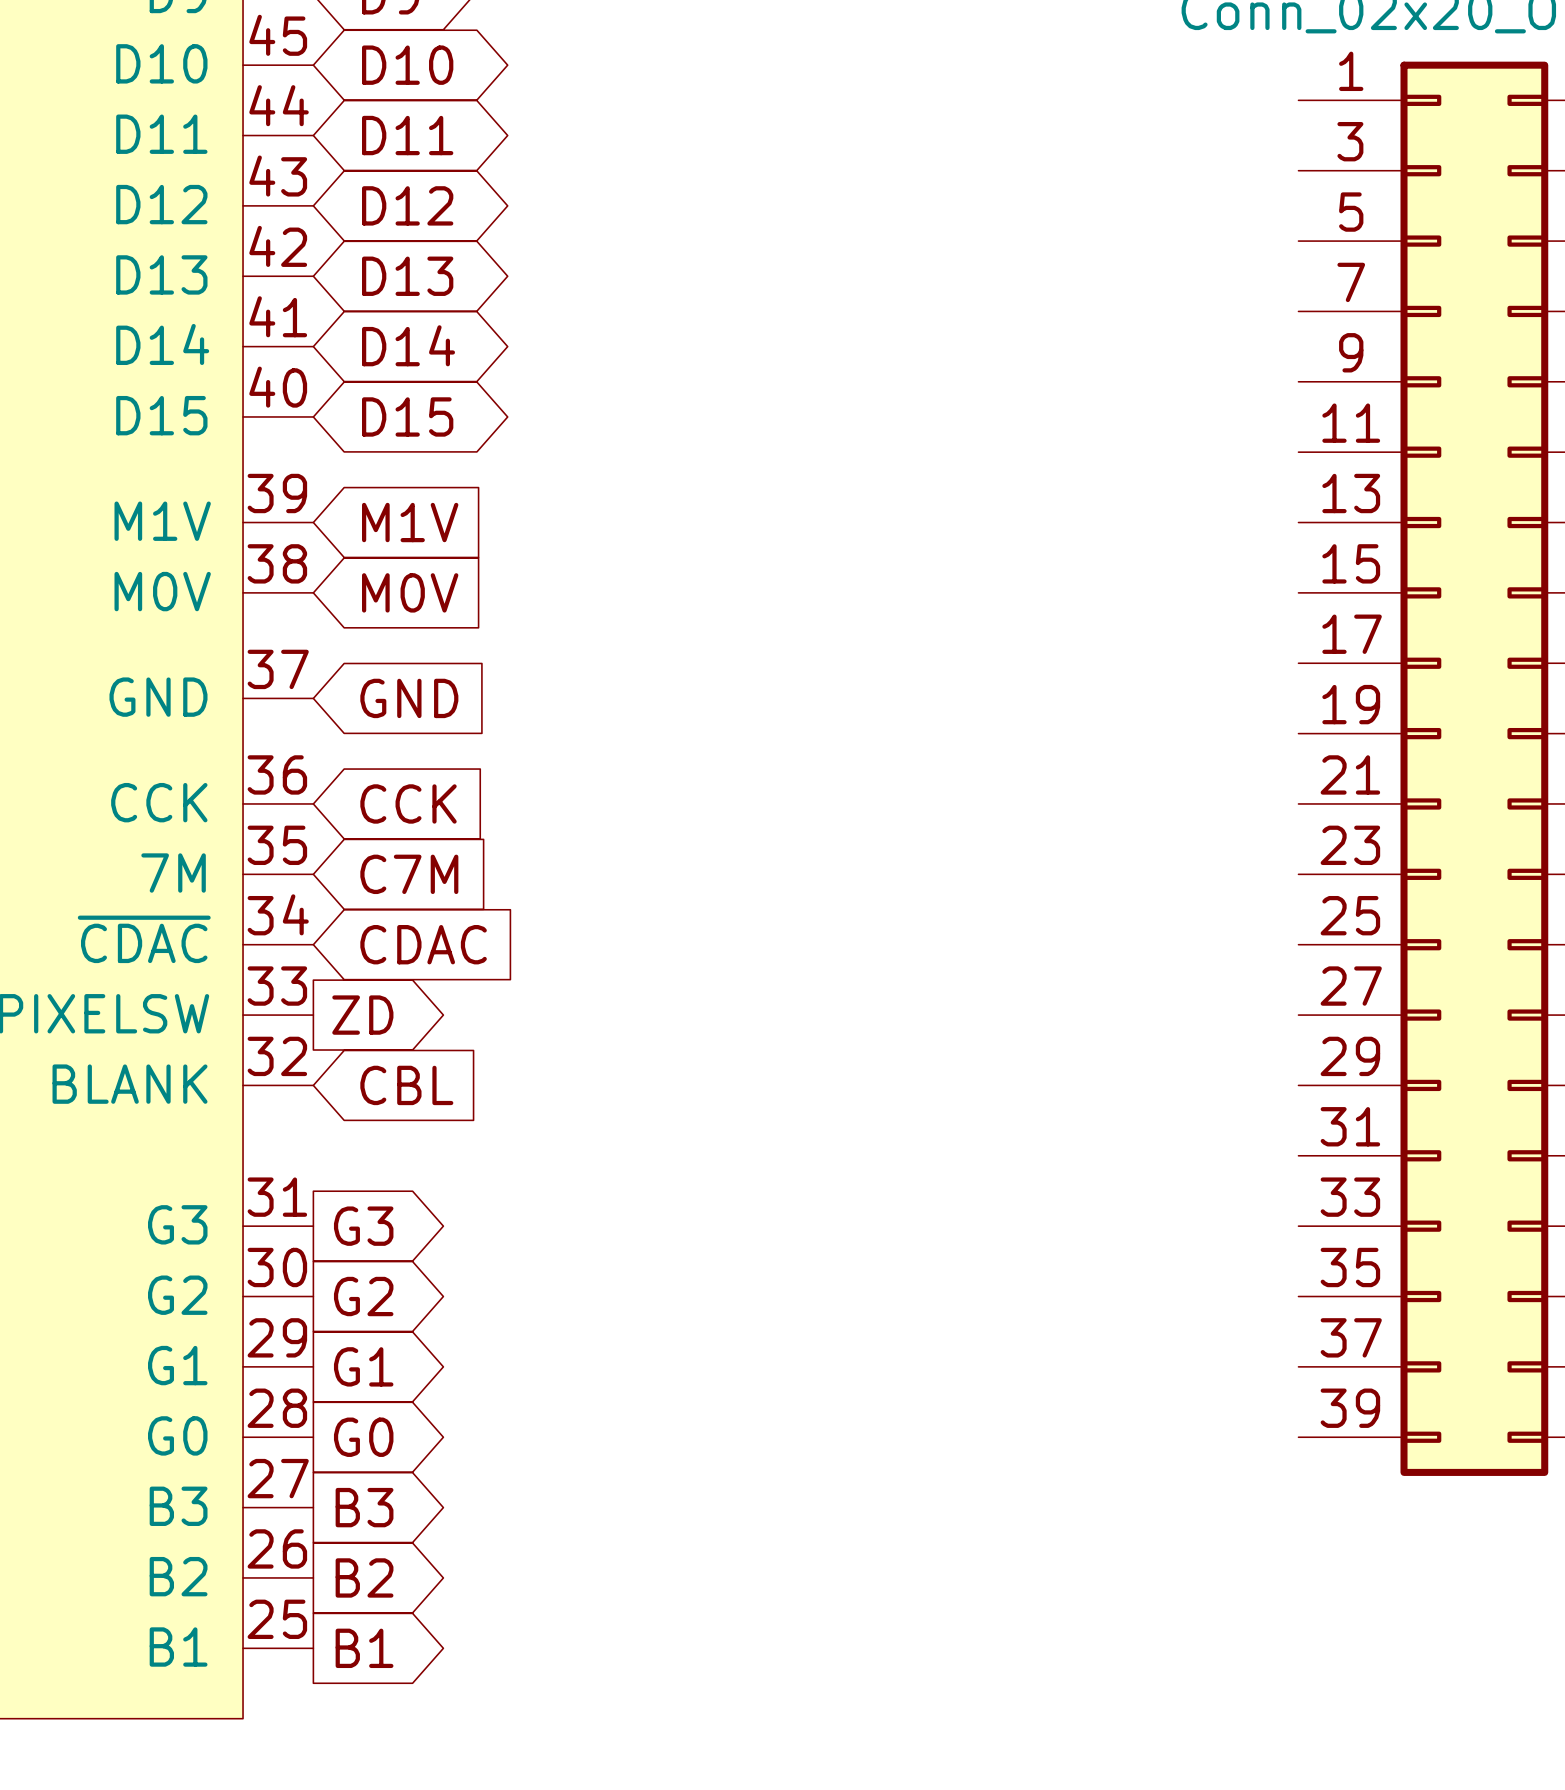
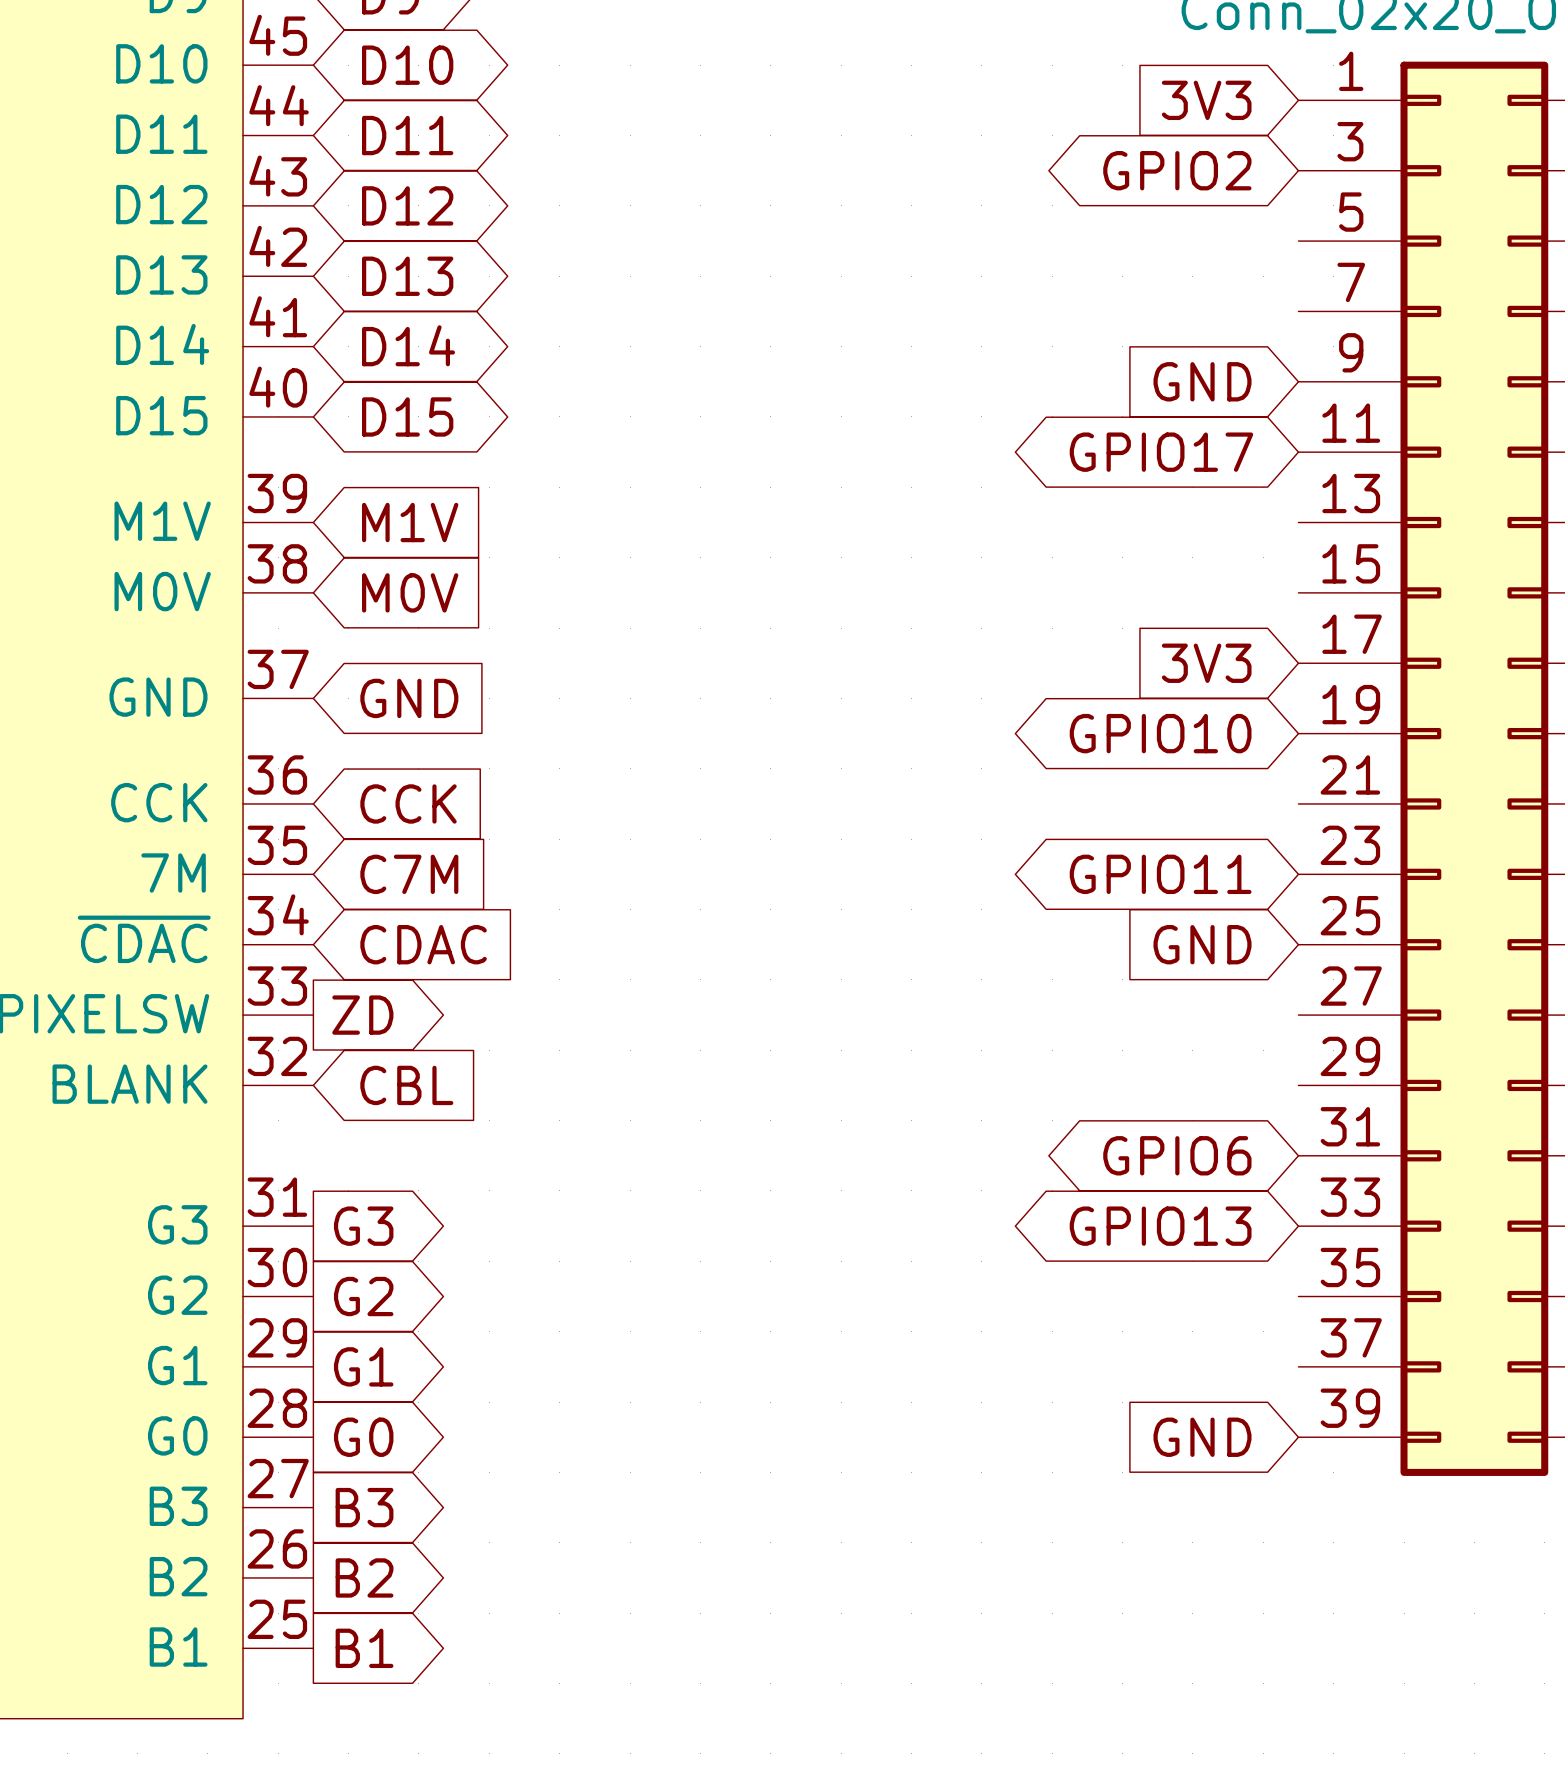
global label: none -> 3V3 (1206, 100)
global label: none -> GPIO2 (1177, 170)
global label: none -> GND (1202, 381)
global label: none -> GPIO17 (1161, 452)
global label: none -> 3V3 (1206, 663)
global label: none -> GPIO10 (1160, 733)
global label: none -> GPIO11 (1160, 874)
global label: none -> GND (1202, 944)
global label: none -> GPIO6 (1177, 1155)
global label: none -> GPIO13 (1160, 1226)
global label: none -> GND (1202, 1437)

